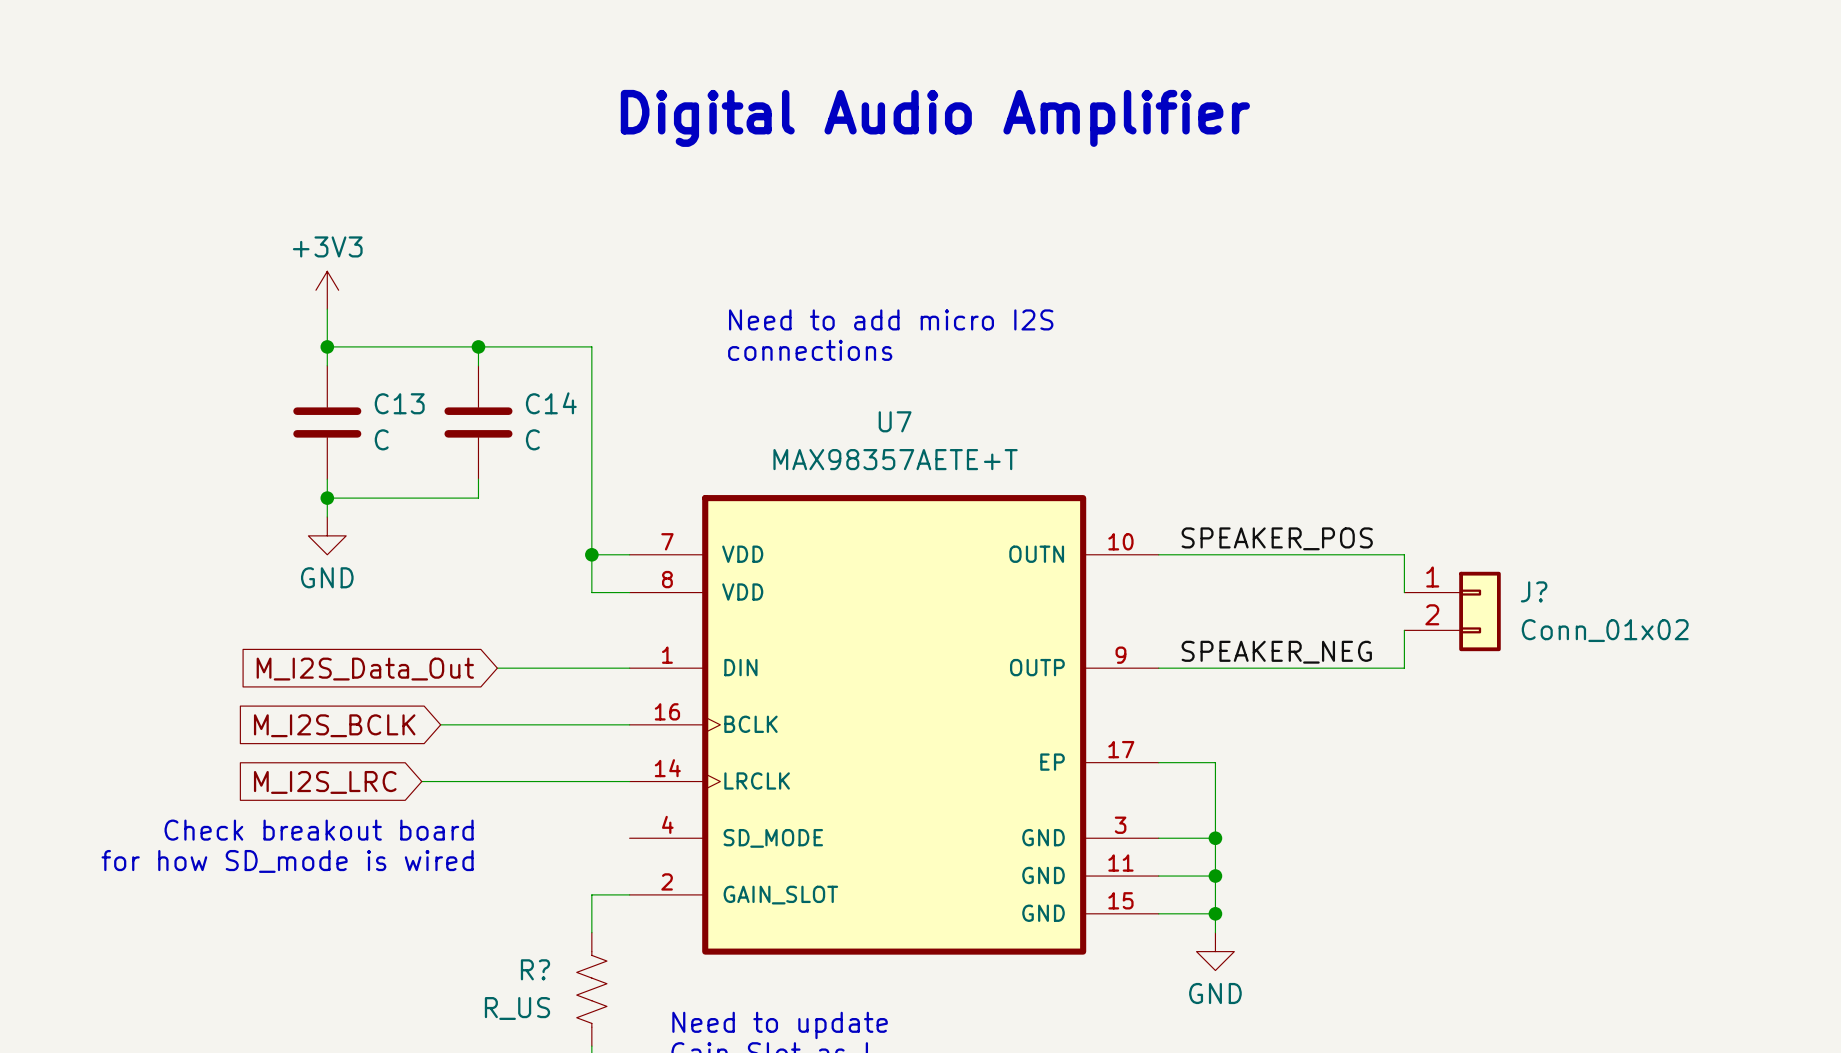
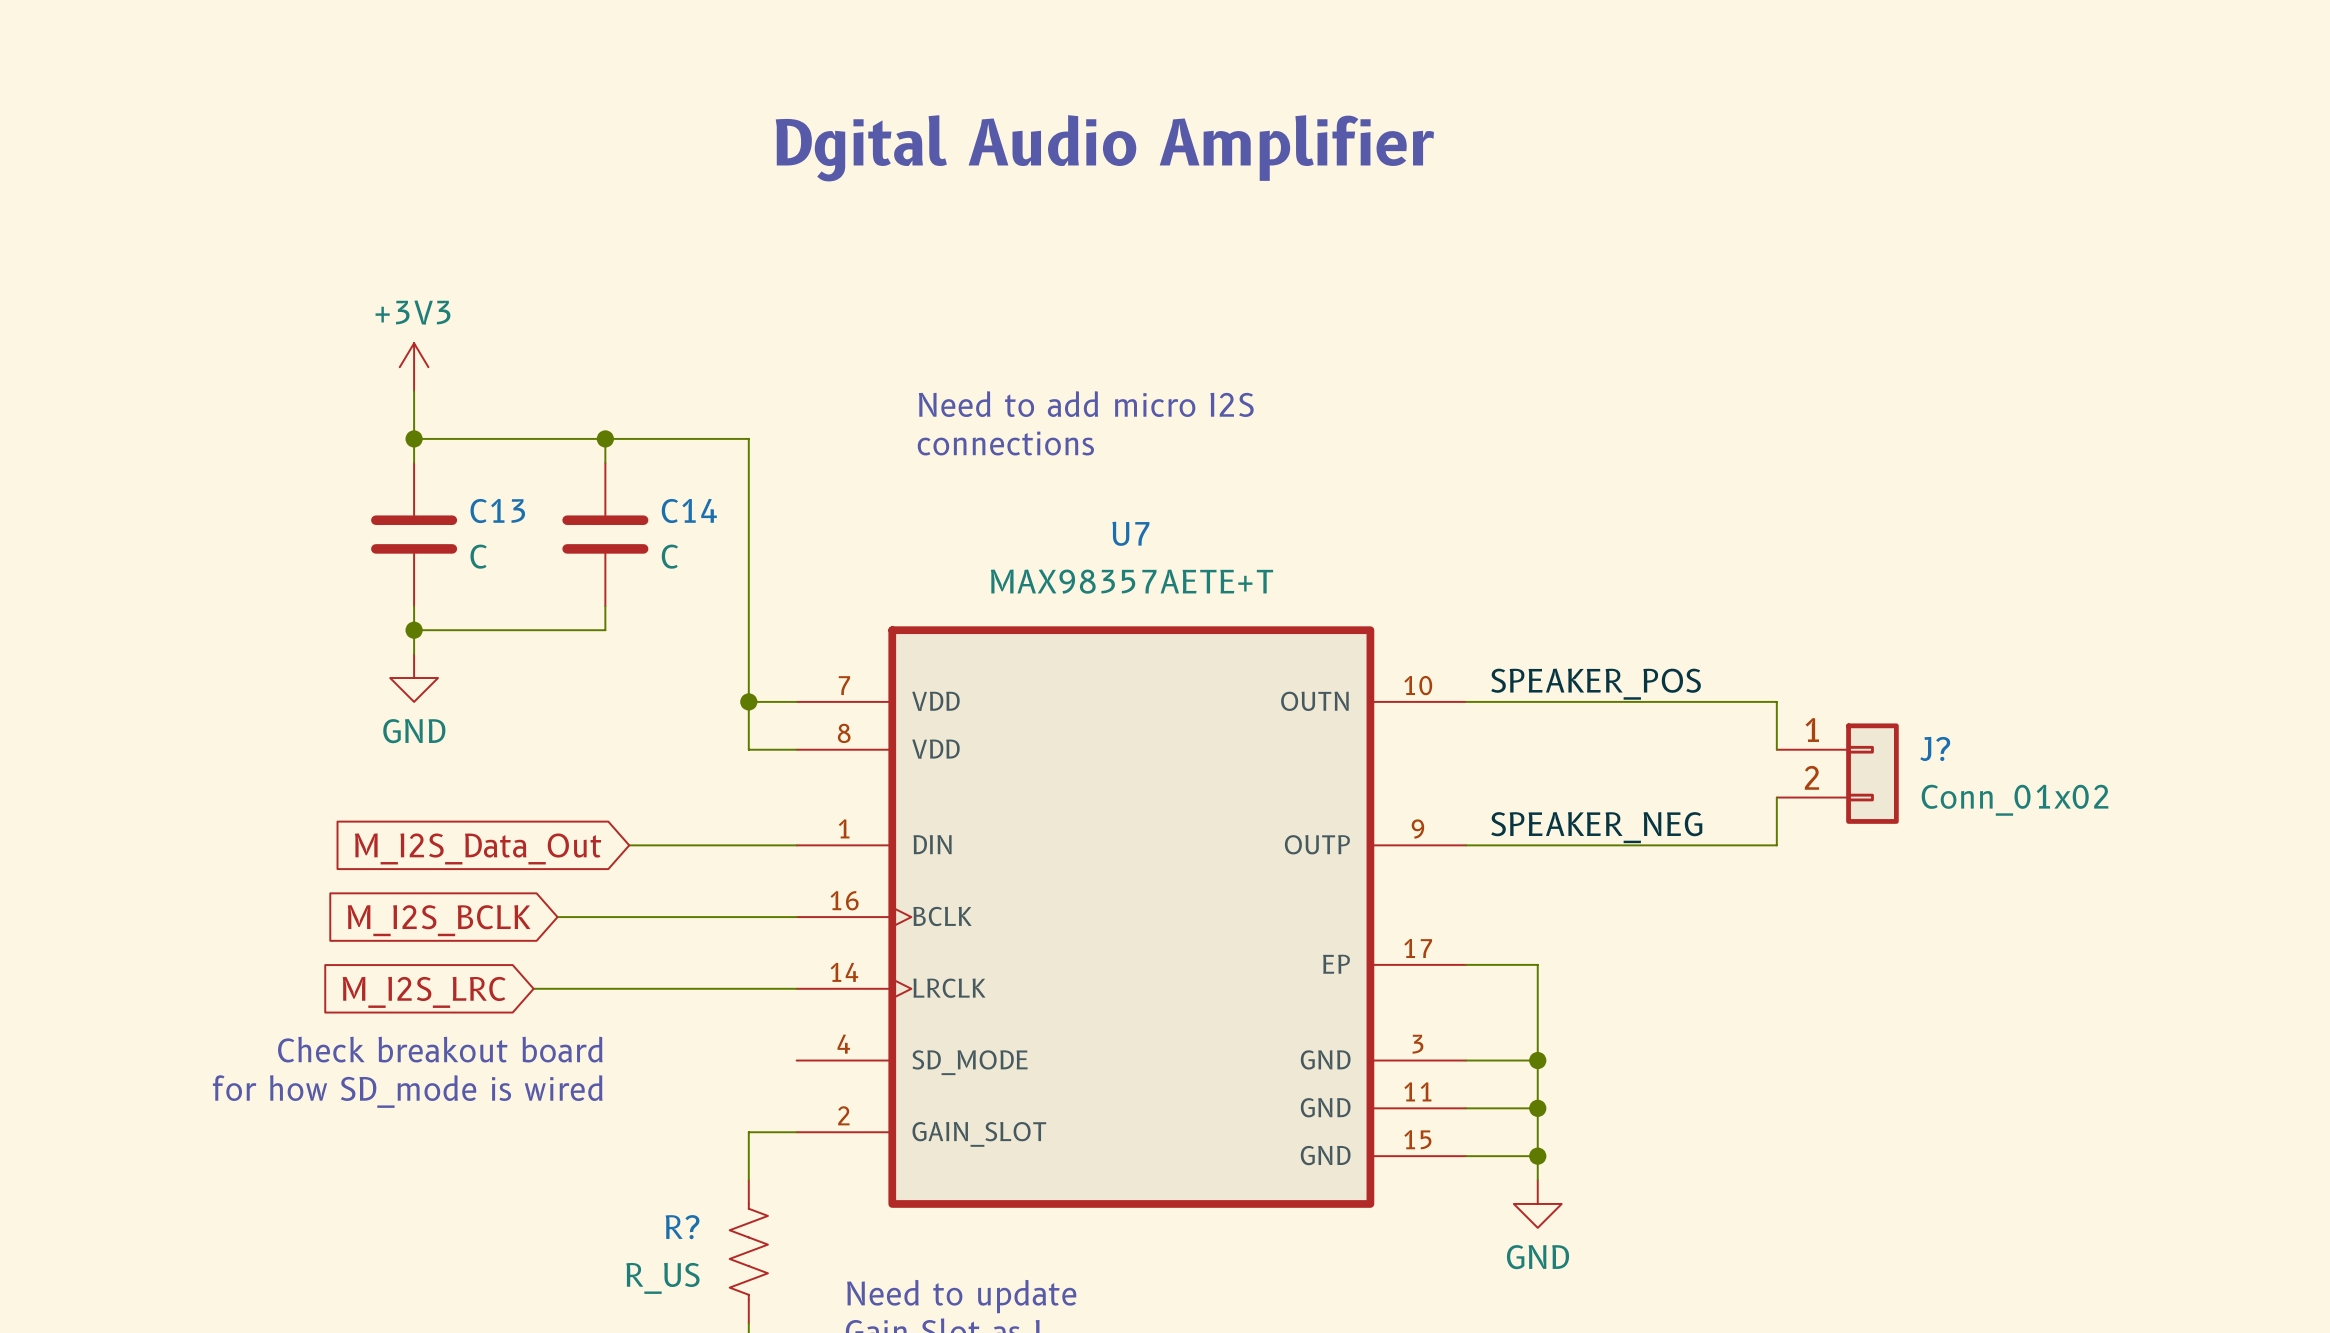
text: Digital Audio Amplifier (935, 118) -> Dgital Audio Amplifier (1104, 148)

